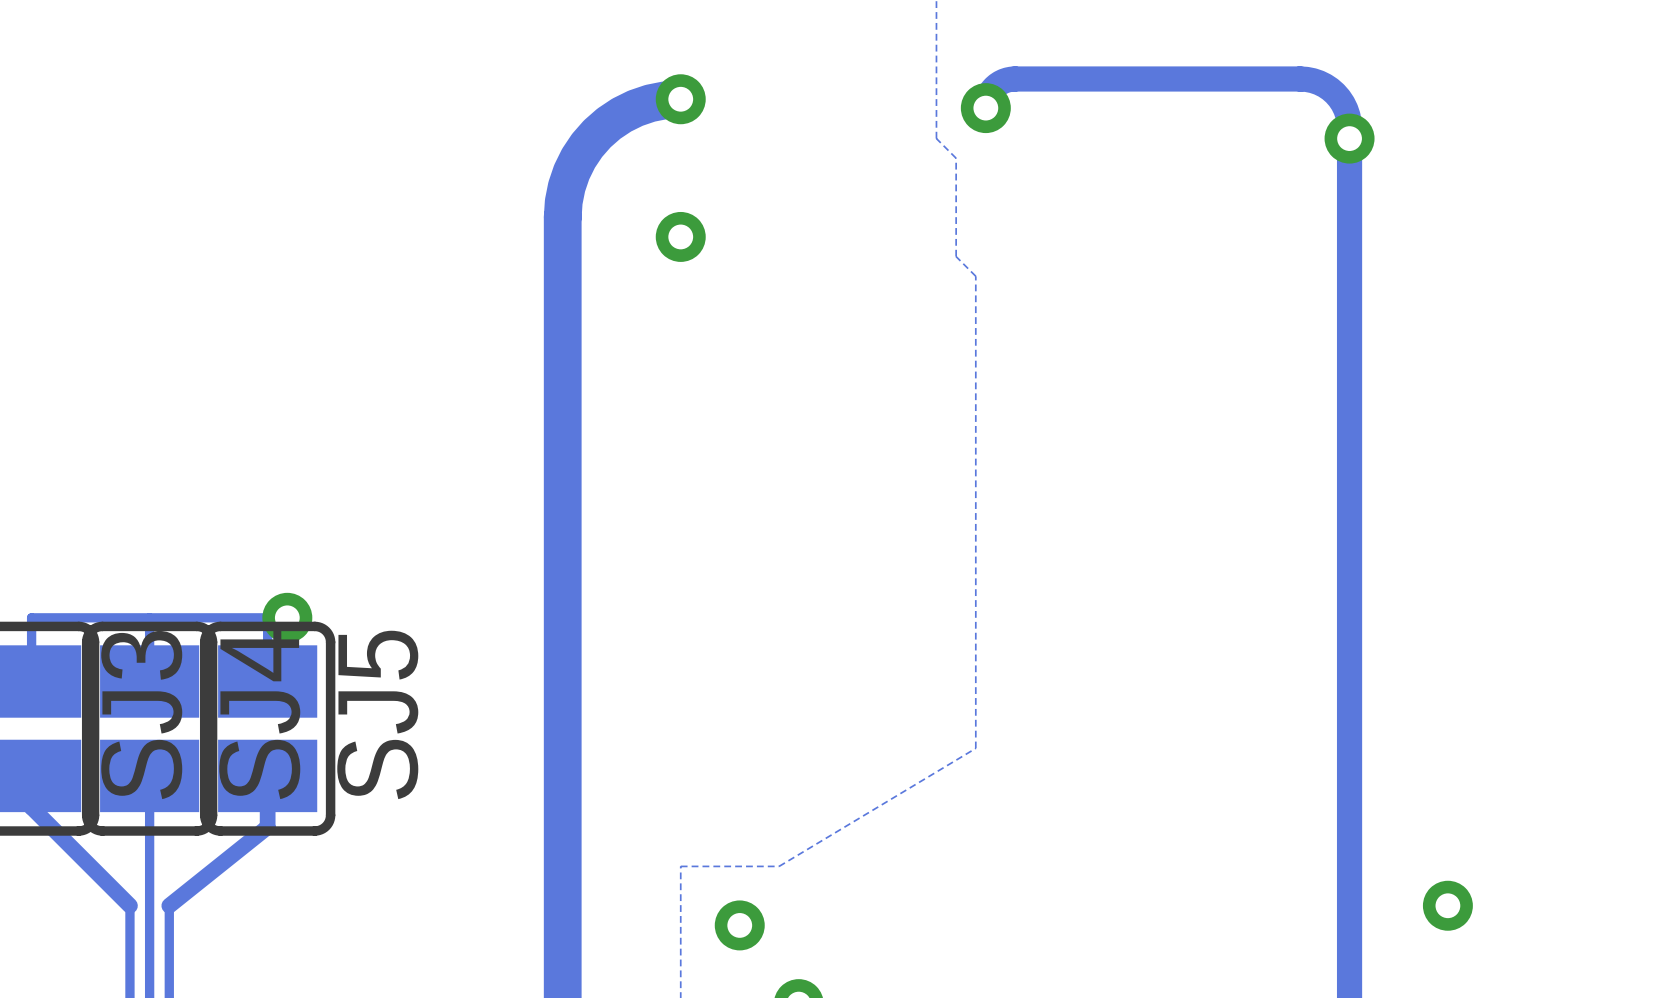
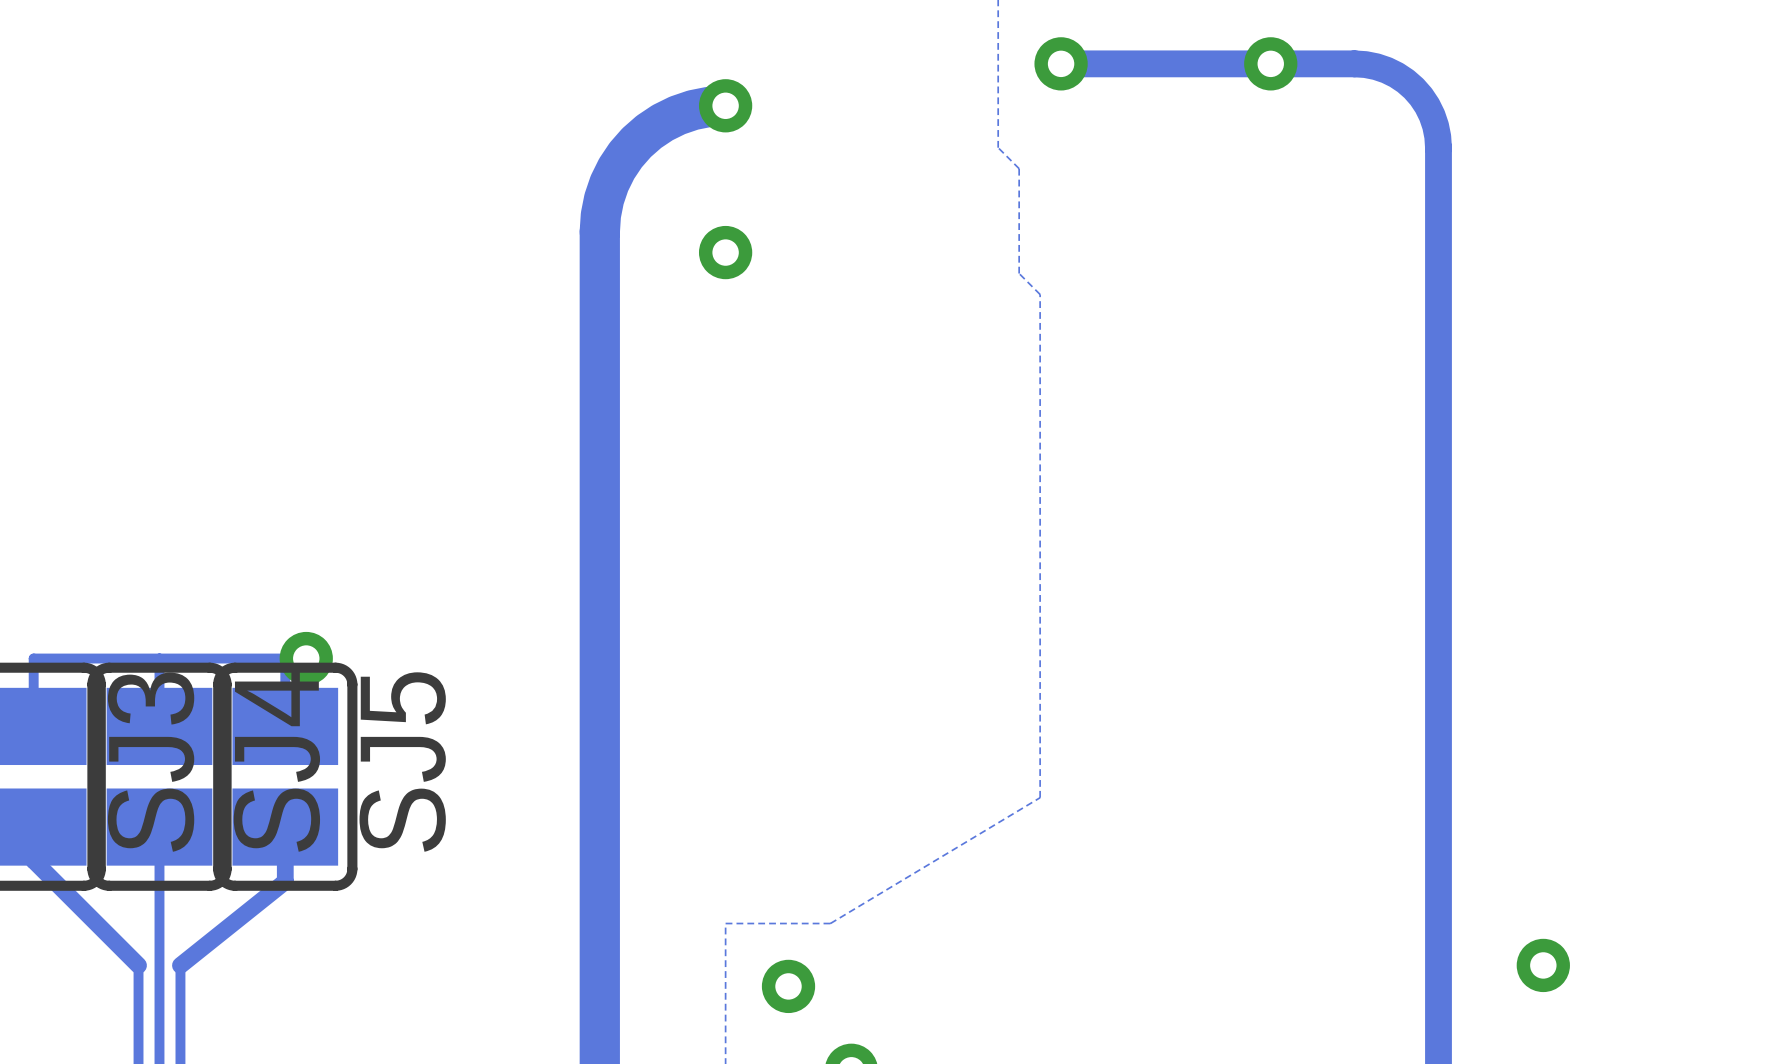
via: none -> (1270, 63)
track: (985, 108) (988, 96) (994, 87) (1011, 79) (1306, 79) (1324, 85) (1339, 98) (1347, 115) (1349, 138) -> (1061, 63) (1354, 63) (1376, 66) (1405, 81) (1421, 96) (1432, 115) (1438, 147)
via position: (985, 108) -> (1061, 63)
via: (1349, 138) -> none

